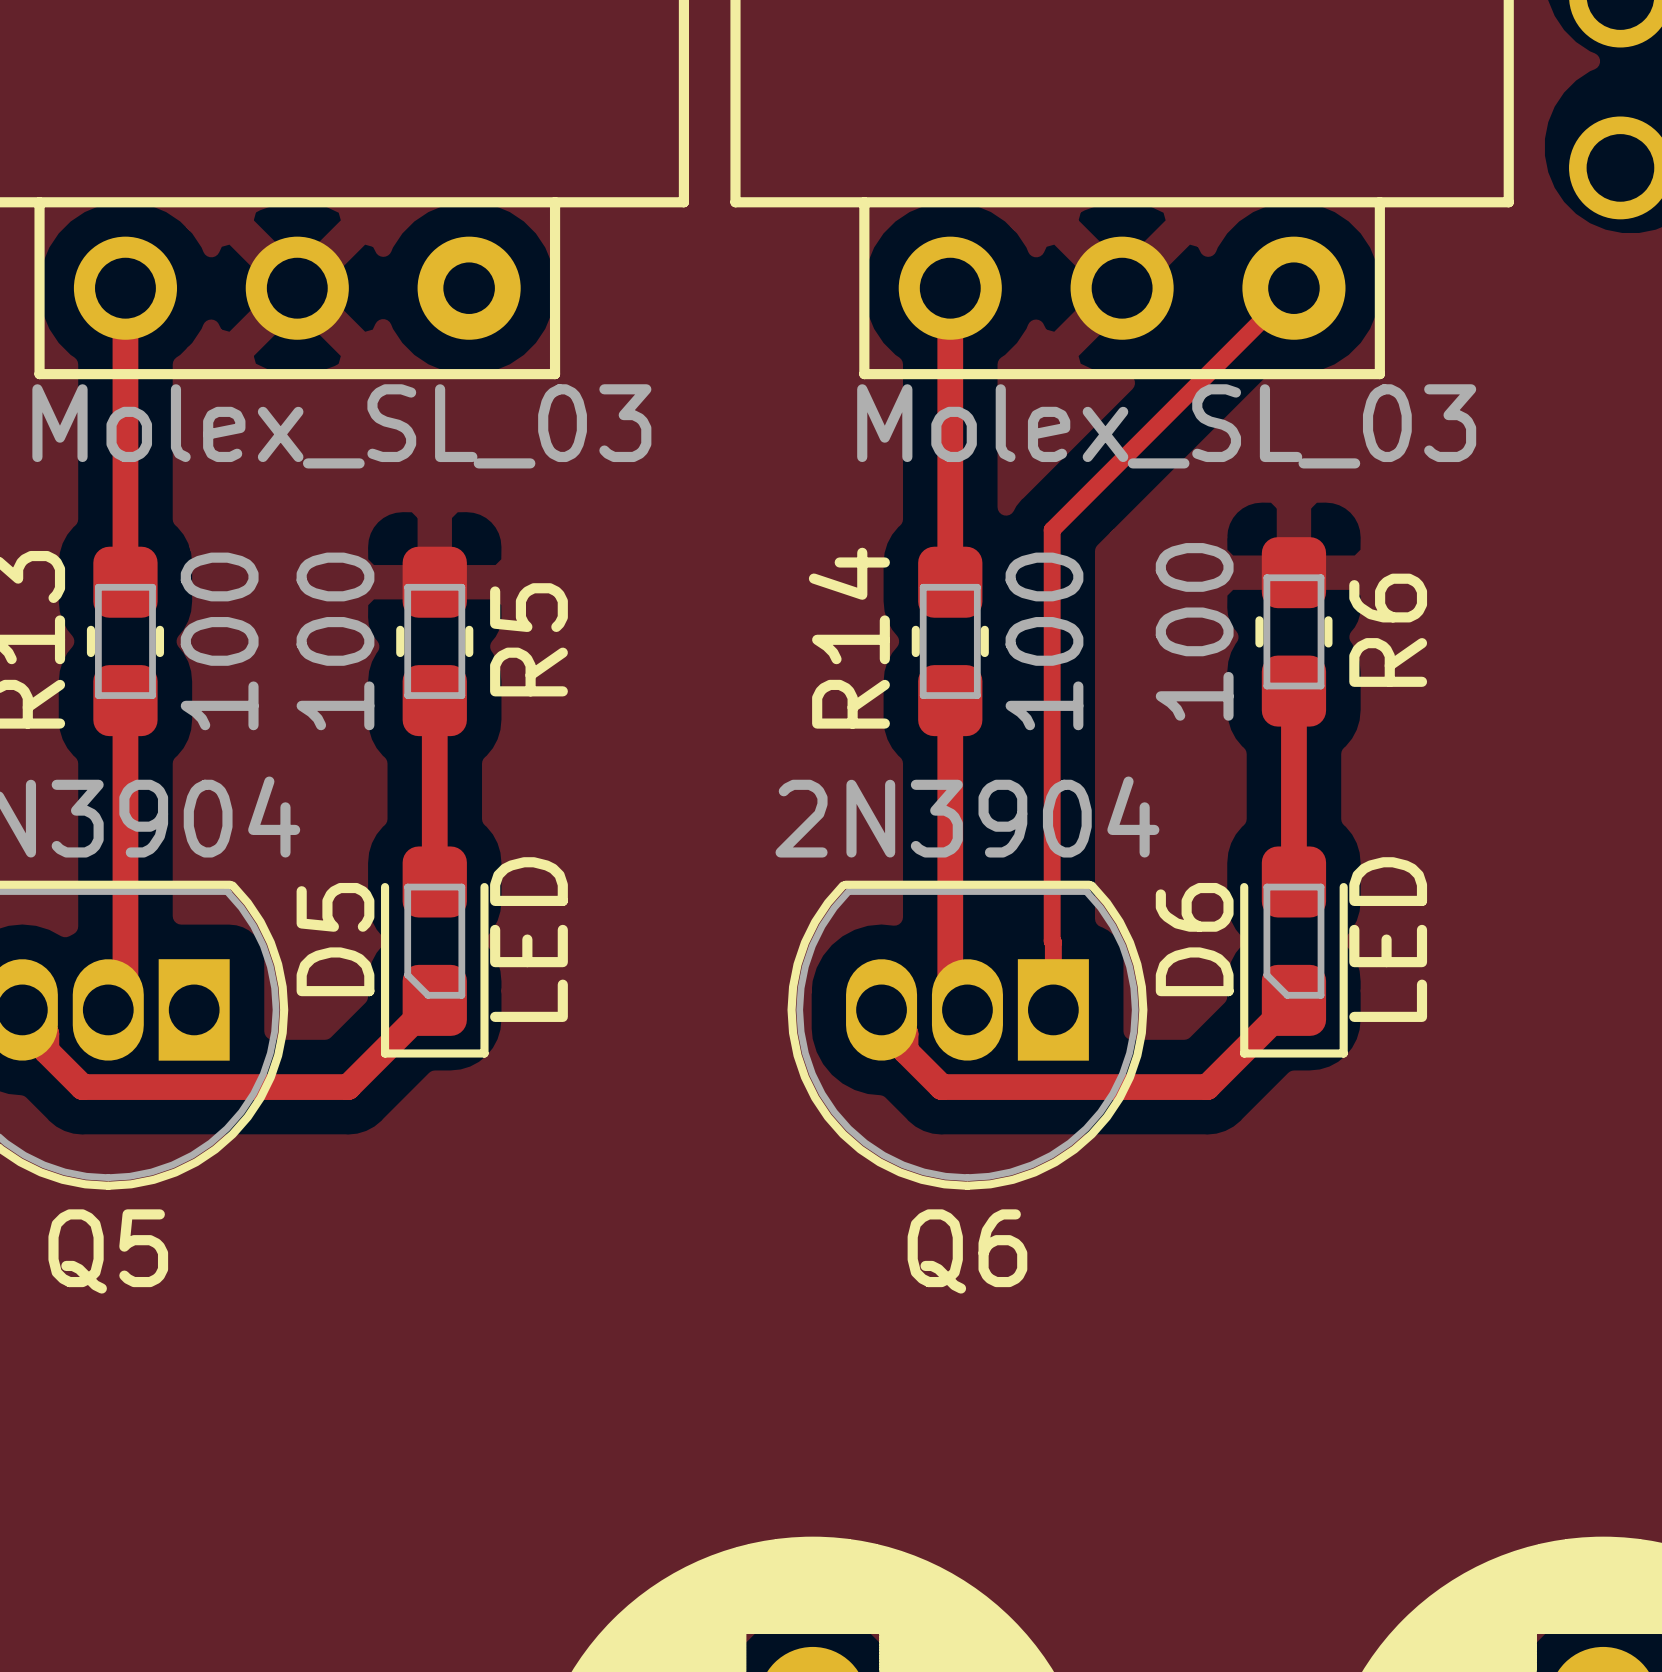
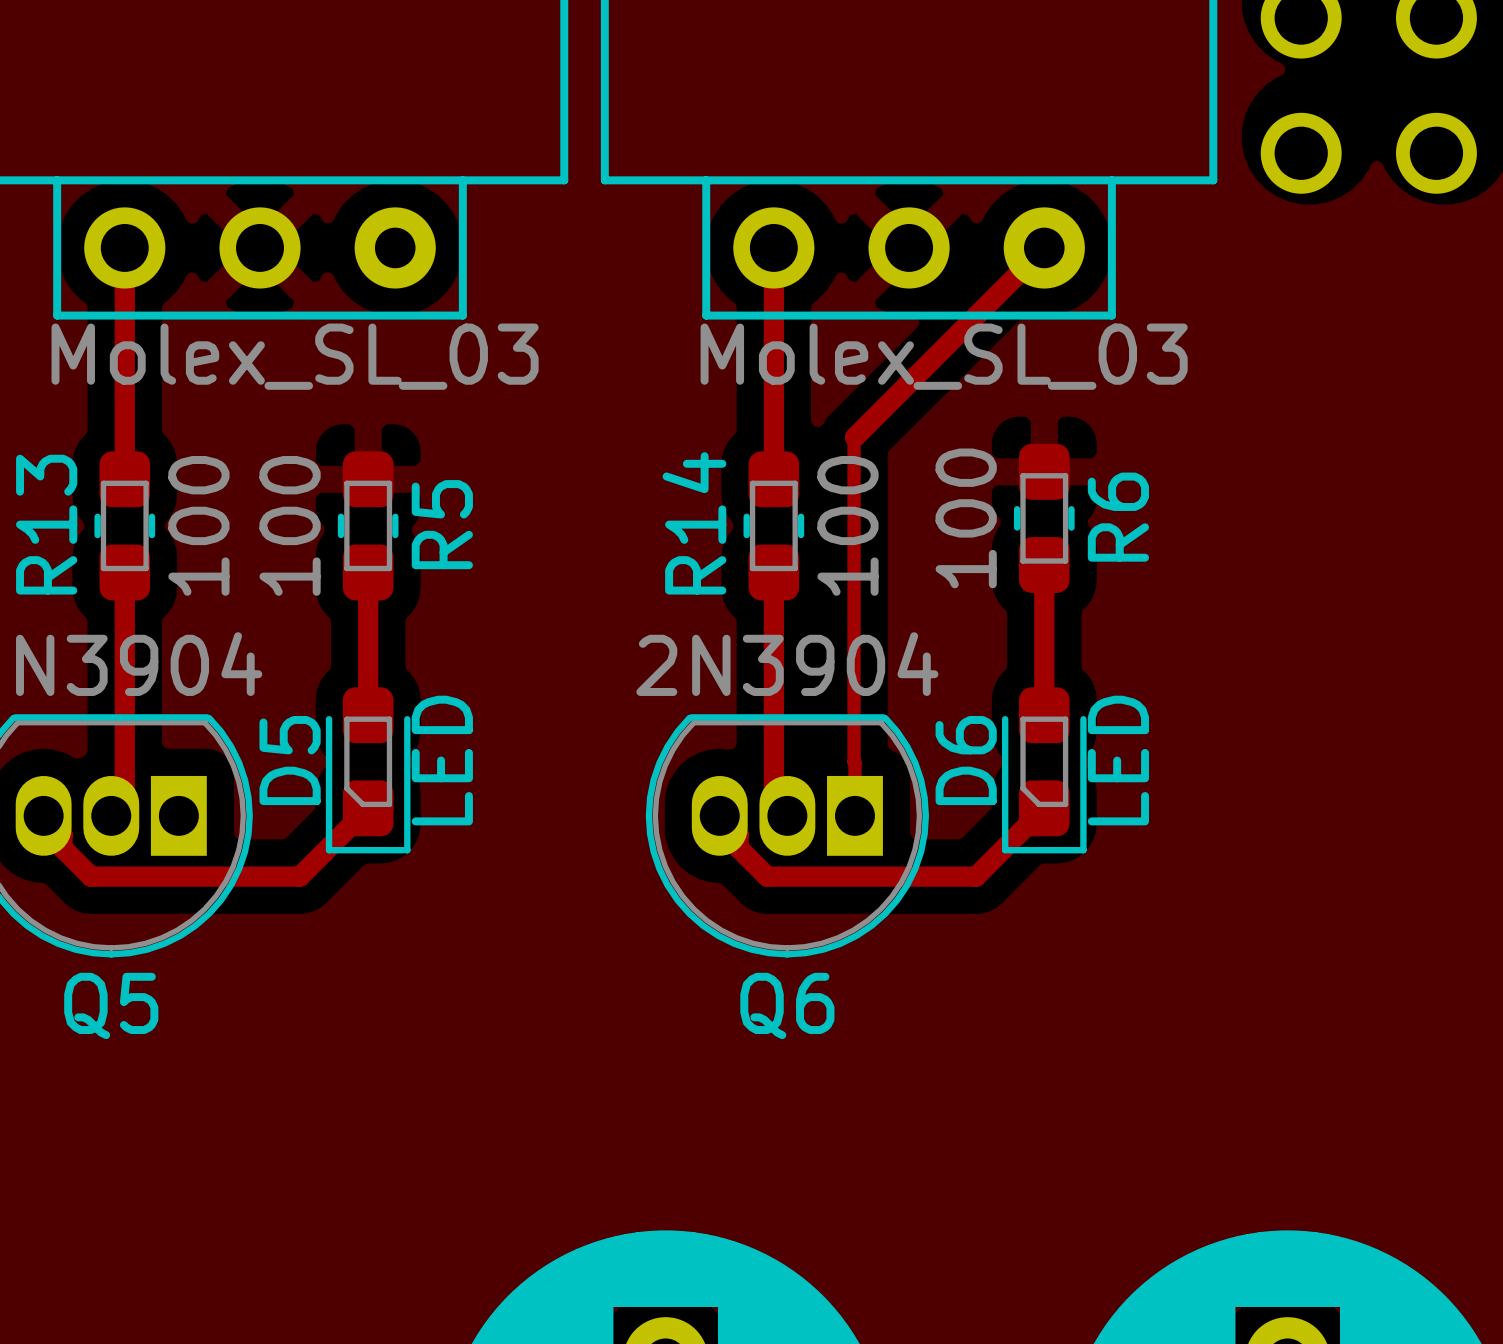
track width: thin (1293, 288) (1053, 528) -> thick (1044, 247) (854, 437)

